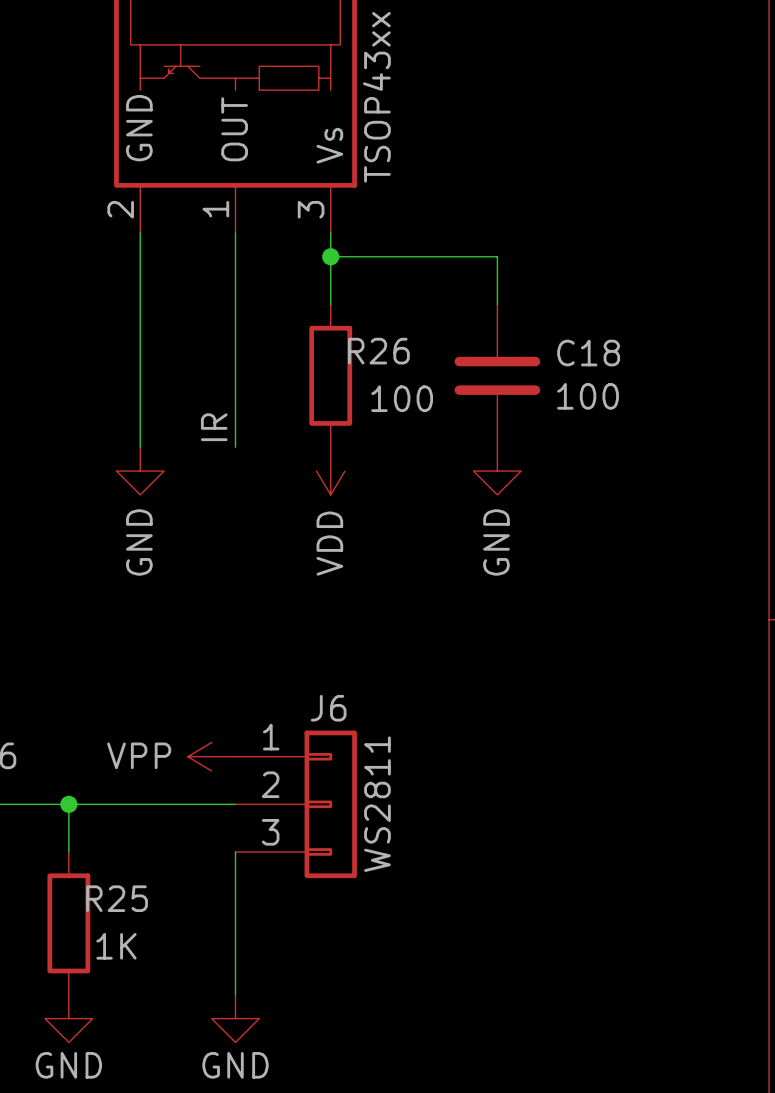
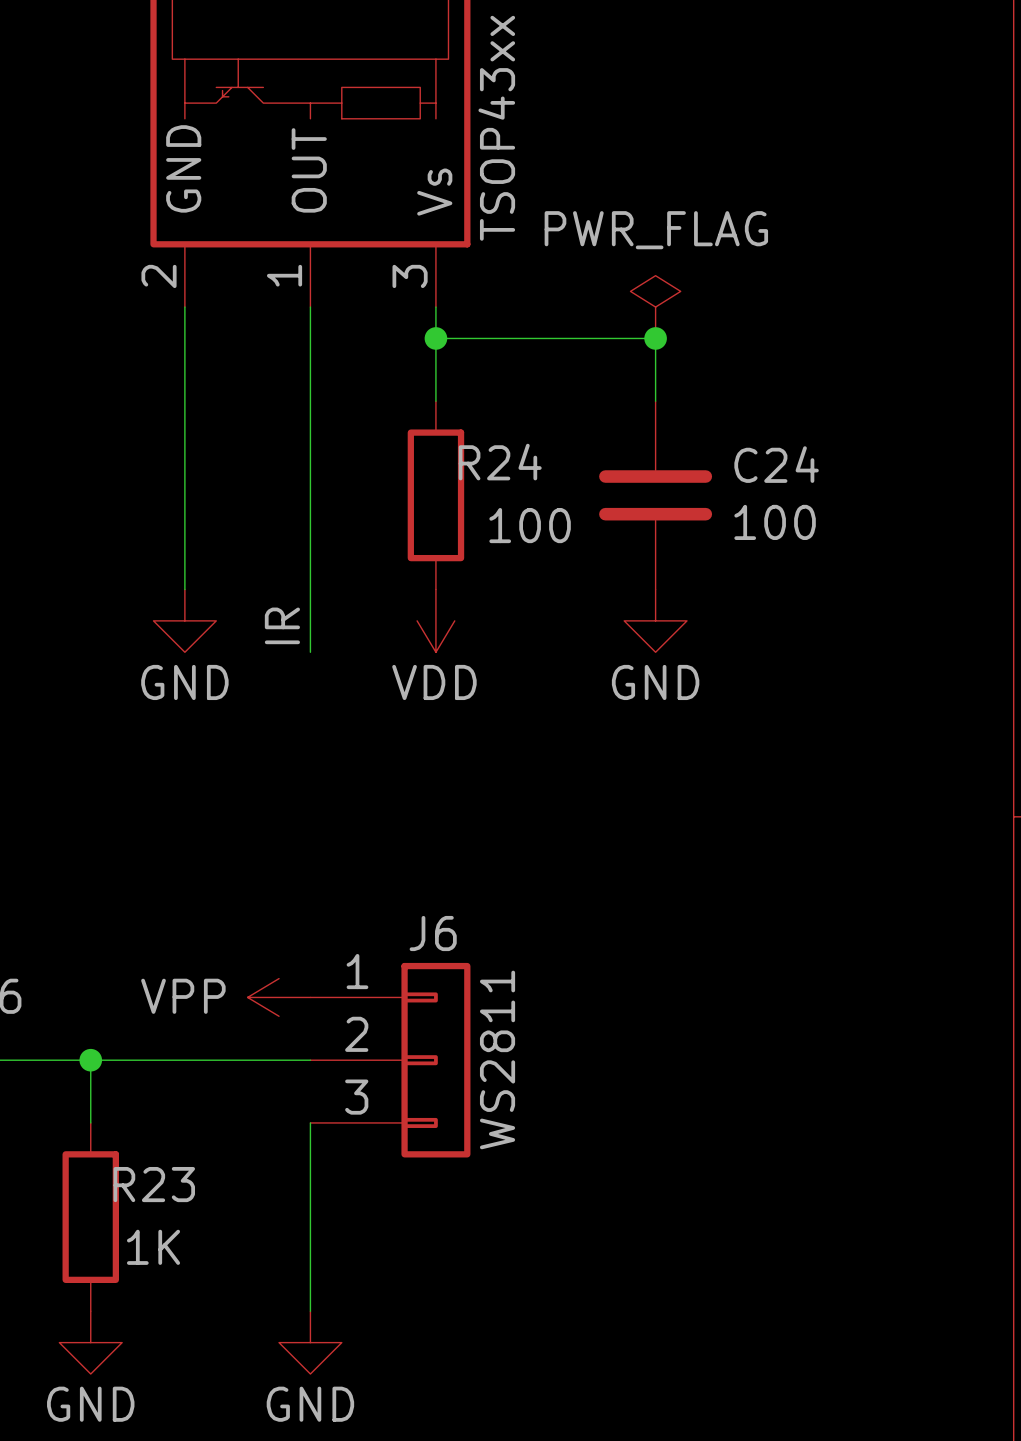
power symbol: none -> PWR_FLAG (655, 307)
junction: none -> (655, 338)
R26 name: R26 (378, 351) -> R24 (500, 462)
C18 name: C18 (588, 353) -> C24 (776, 464)
label position: IR (214, 427) -> IR (282, 625)
wire: none -> (310, 589) (310, 652)
power symbol text rotation: 0° (139, 542) -> 90° clockwise (184, 682)
power symbol text rotation: 0° (496, 542) -> 90° clockwise (655, 682)
power symbol text rotation: 0° (329, 543) -> 90° clockwise (434, 682)
R25 name: R25 (117, 898) -> R23 (154, 1184)

